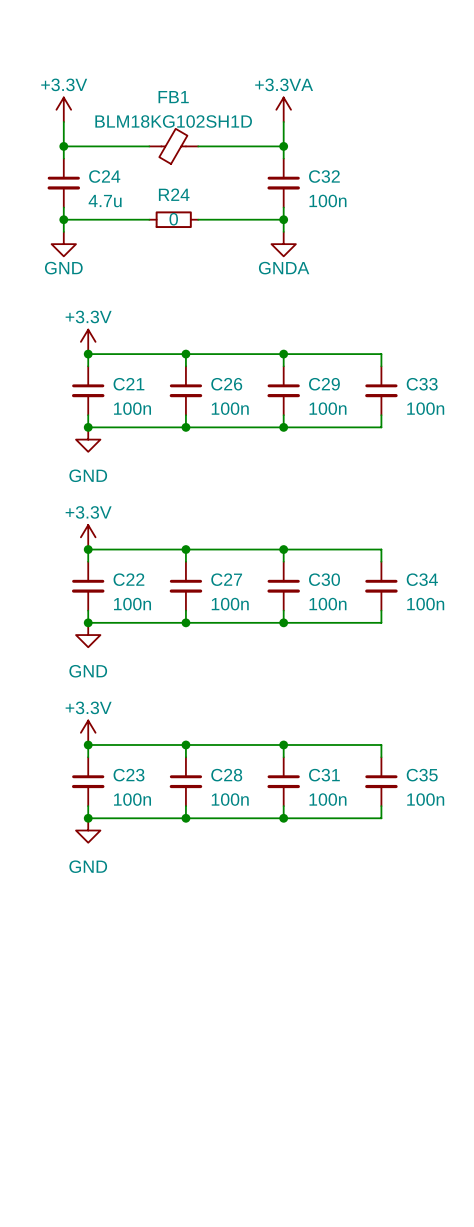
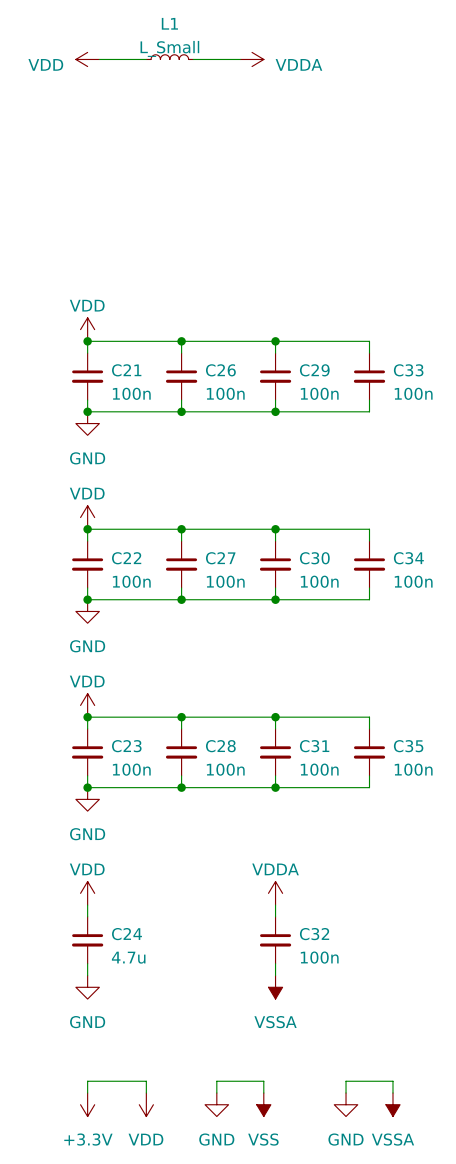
L1: none -> L_Small (169, 57)
power symbol: none -> VDD (87, 59)
wire: none -> (99, 59) (146, 59)
wire: none -> (193, 59) (240, 59)
power symbol: none -> VDDA (252, 59)
power symbol: +3.3V (63, 109) -> none
power symbol: +3.3VA (283, 109) -> none
wire: (63, 121) (63, 158) -> none
wire: (283, 121) (283, 158) -> none
wire: (63, 146) (149, 146) -> none
junction: (63, 146) -> none
FB1: BLM18KG102SH1D (173, 146) -> none
wire: (198, 146) (283, 146) -> none
junction: (283, 146) -> none
C24 position: (63, 183) -> (87, 940)
C32 position: (283, 183) -> (275, 940)
wire: (63, 207) (63, 231) -> none
wire: (283, 207) (283, 231) -> none
wire: (63, 219) (149, 219) -> none
junction: (63, 219) -> none
R24: 0 (173, 219) -> none
wire: (198, 219) (283, 219) -> none
junction: (283, 219) -> none
power symbol: GND (63, 244) -> none
power symbol: GNDA (283, 244) -> none
power symbol: +3.3V (88, 341) -> VDD (87, 329)
power symbol: +3.3V (88, 537) -> VDD (87, 517)
power symbol: +3.3V (88, 732) -> VDD (87, 705)
power symbol: none -> VDD (87, 893)
power symbol: none -> VDDA (275, 893)
wire: none -> (87, 905) (87, 916)
wire: none -> (275, 905) (275, 916)
wire: none -> (87, 963) (87, 975)
wire: none -> (275, 963) (275, 975)
power symbol: none -> GND (87, 987)
power symbol: none -> VSSA (275, 987)
wire: none -> (87, 1093) (87, 1081) (146, 1081) (146, 1093)
wire: none -> (216, 1093) (216, 1081) (263, 1081) (263, 1093)
wire: none -> (346, 1093) (346, 1081) (392, 1081) (392, 1093)
power symbol: none -> +3.3V (87, 1104)
power symbol: none -> VDD (146, 1104)
power symbol: none -> GND (216, 1104)
power symbol: none -> VSS (263, 1104)
power symbol: none -> GND (346, 1104)
power symbol: none -> VSSA (392, 1104)

